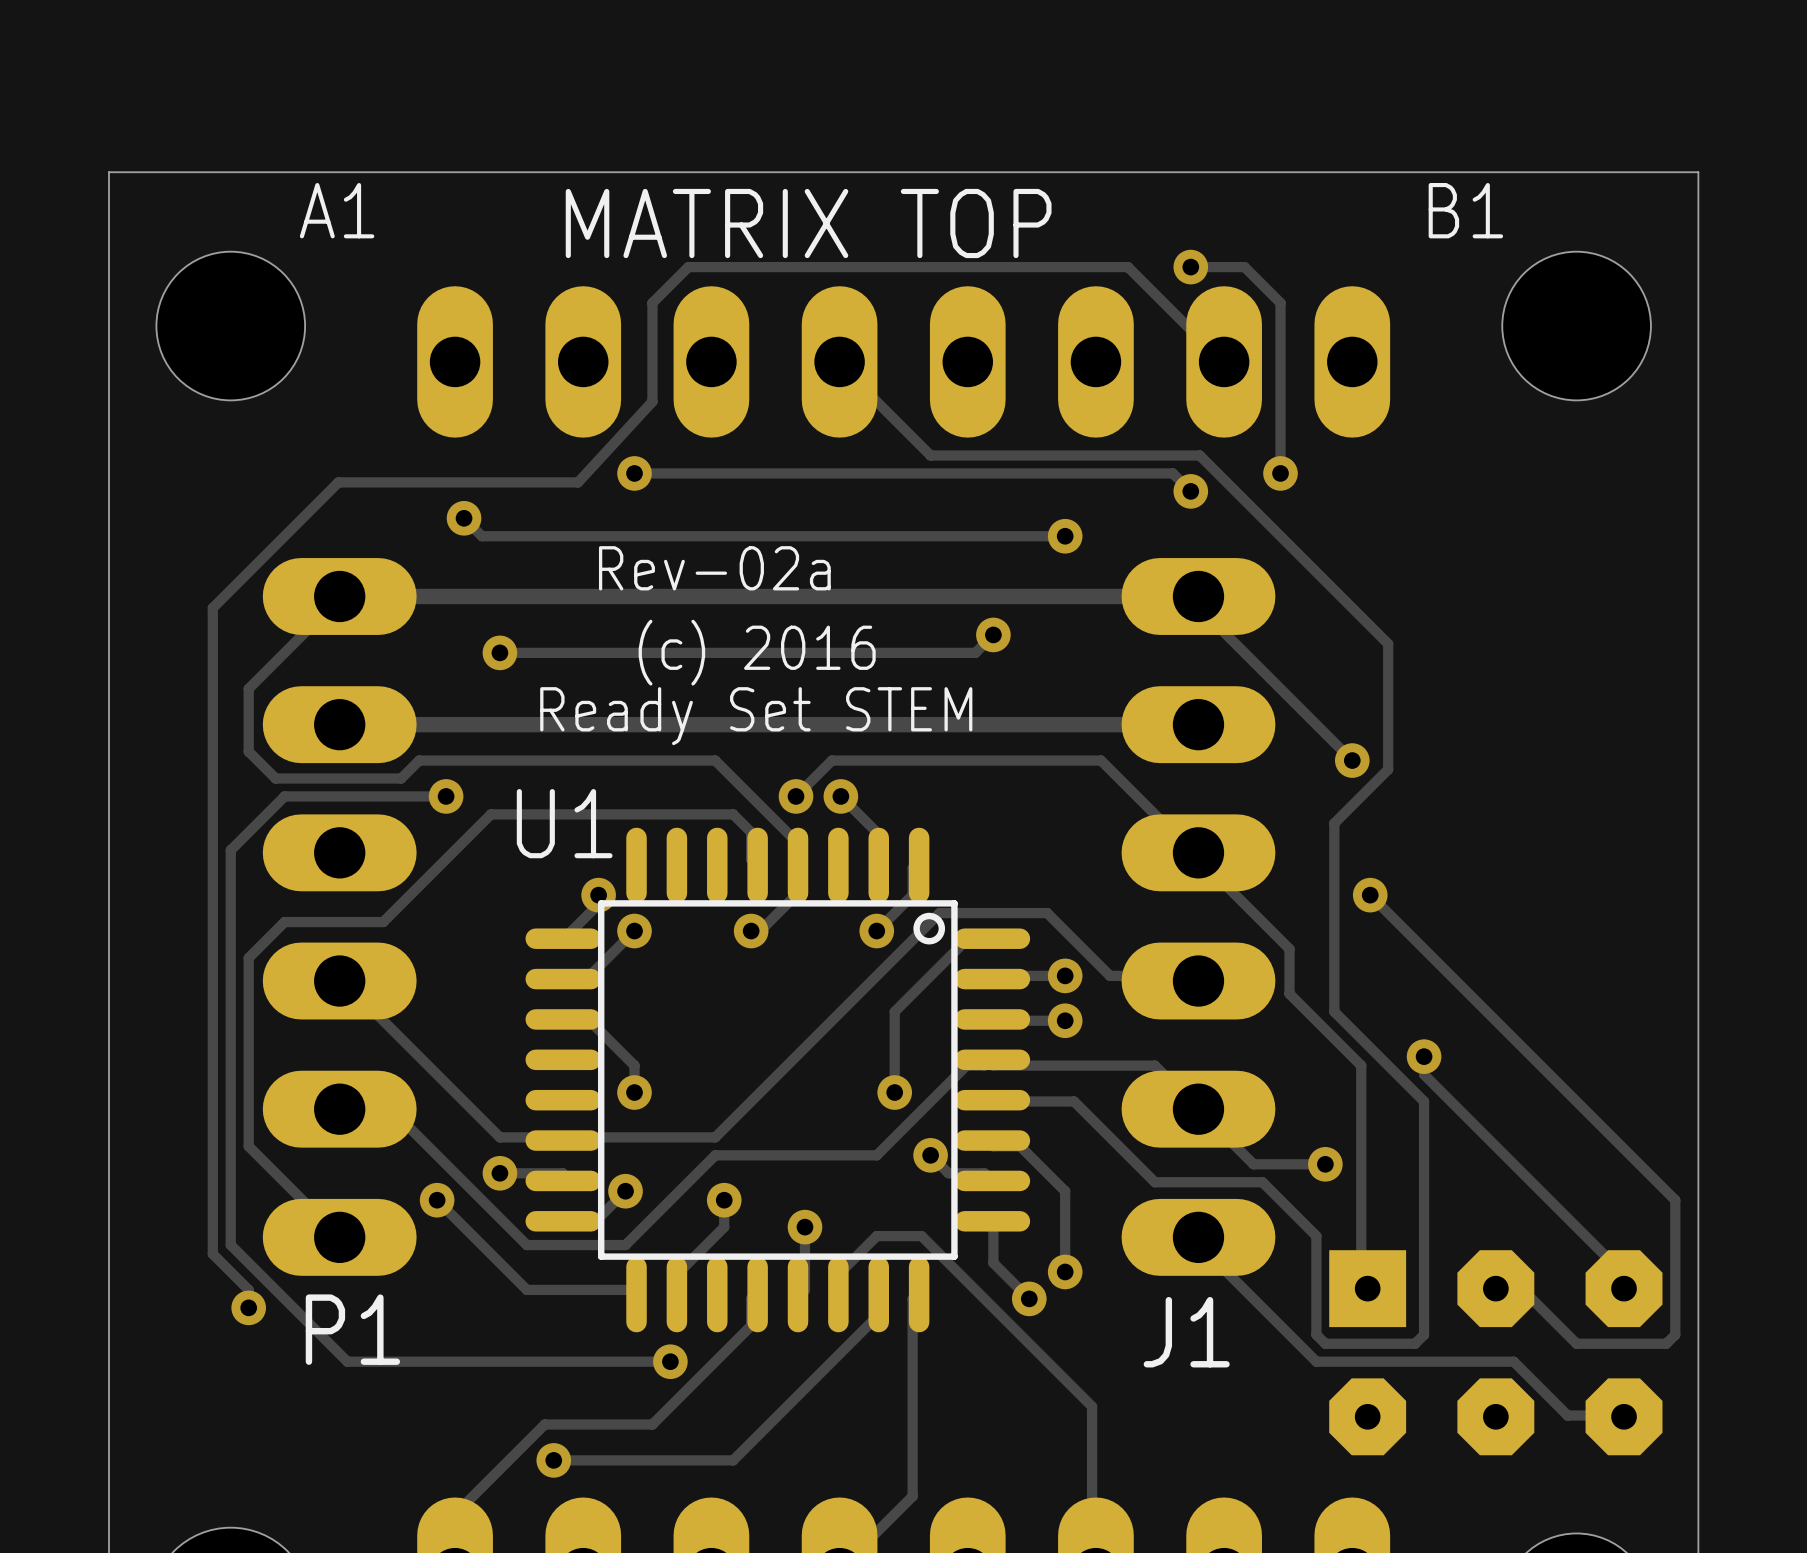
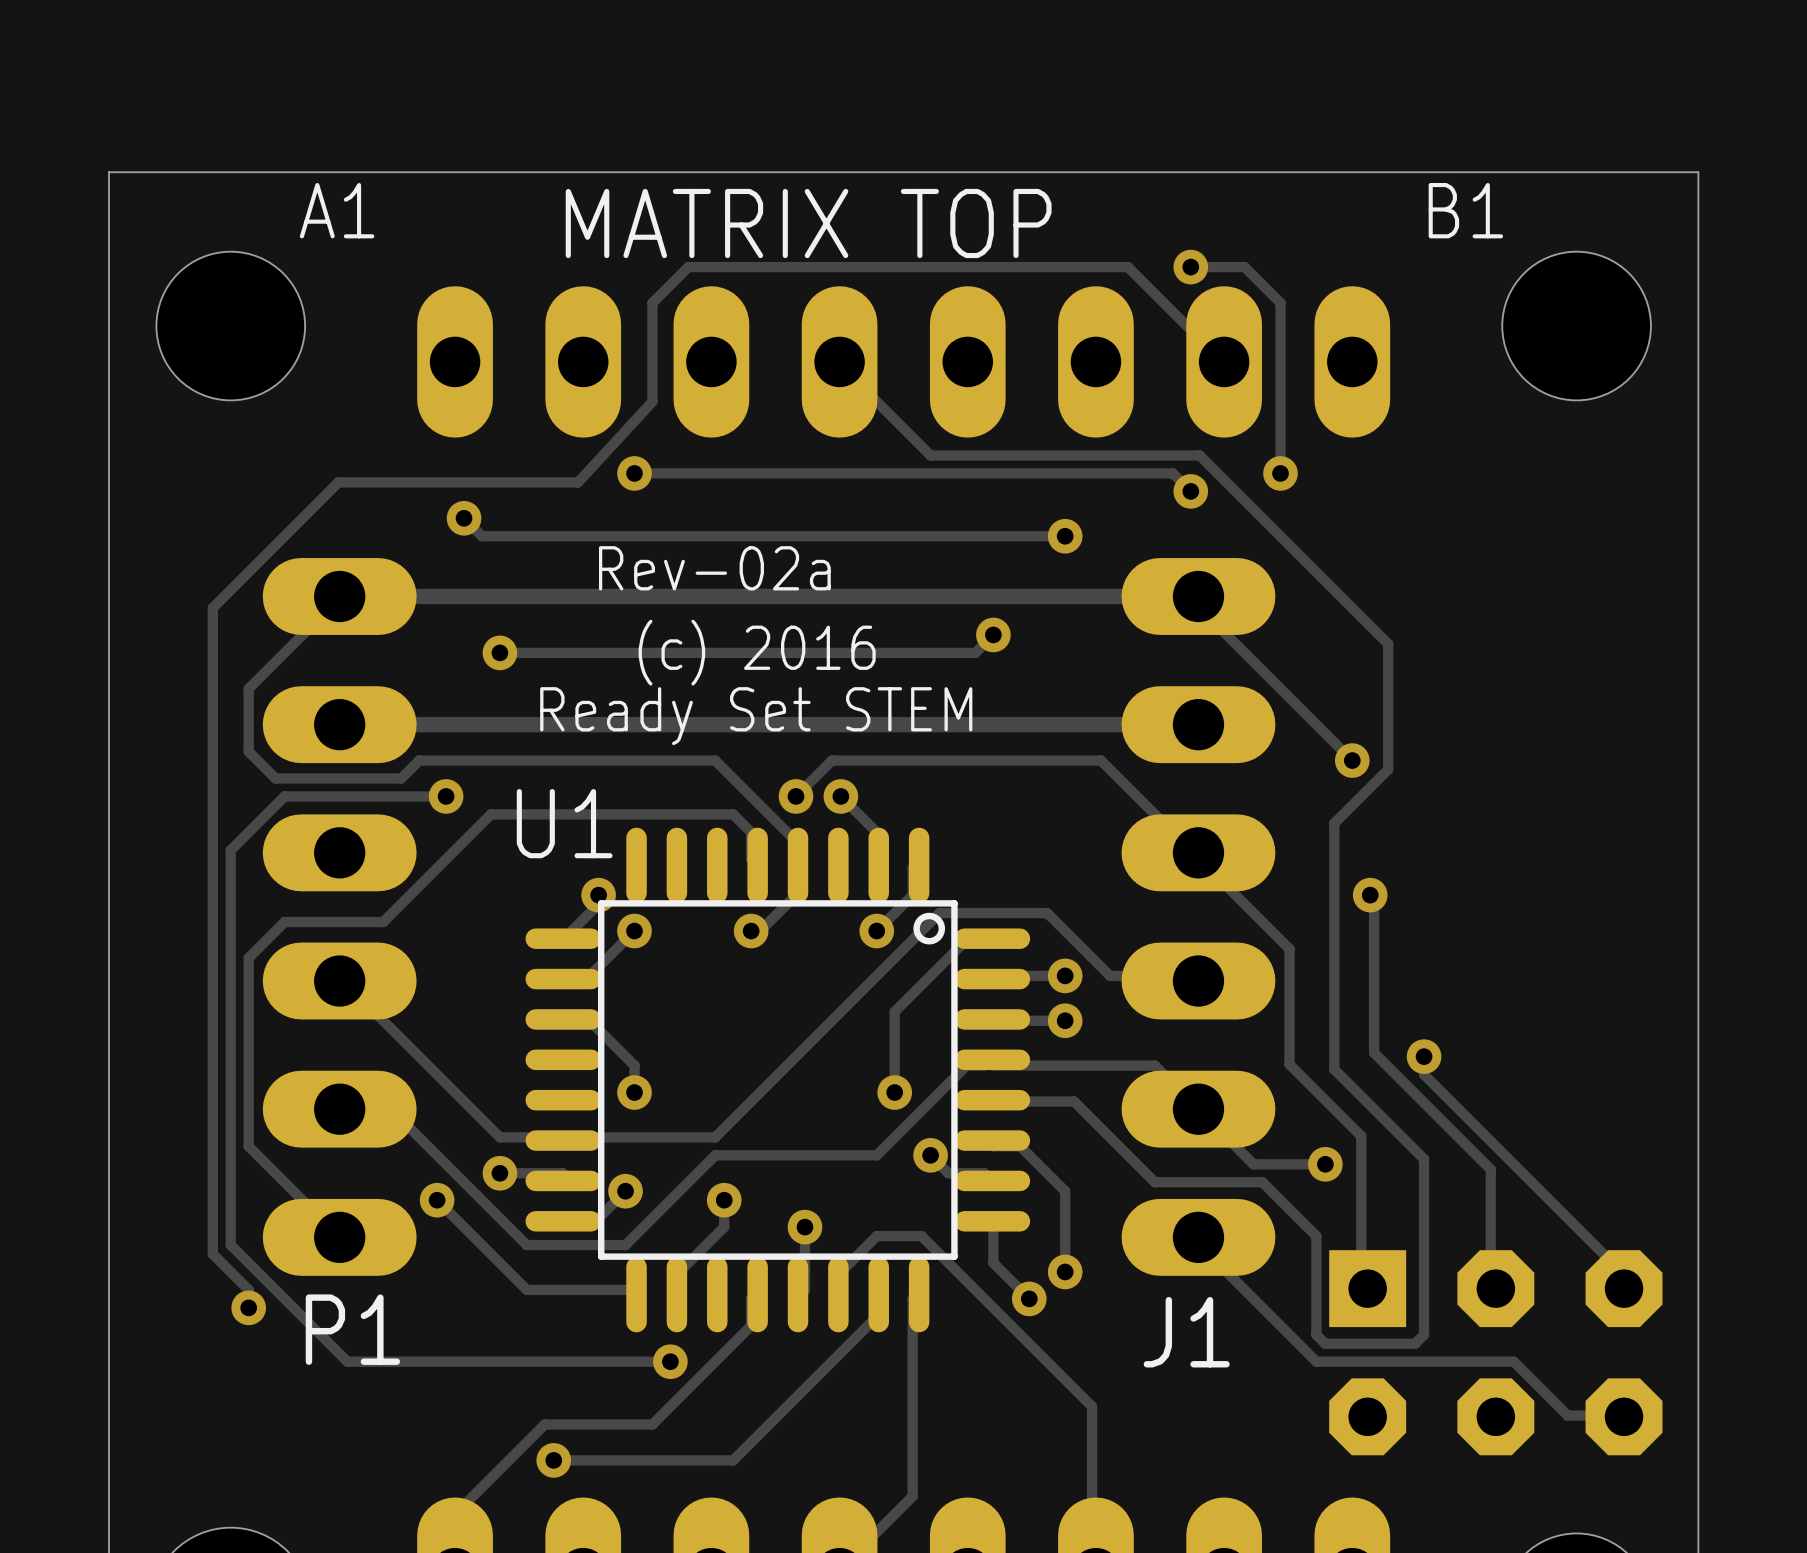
track: (1370, 895) (1675, 1200) (1675, 1334) (1666, 1343) (1576, 1343) (1522, 1289) (1495, 1288) -> (1370, 895) (1374, 900) (1374, 1052) (1490, 1169) (1490, 1286) (1495, 1288)
track: (1289, 993) (1361, 1065) (1361, 1136) -> (1289, 993) (1289, 1064) (1361, 1136)
track: (1334, 1011) (1424, 1101) (1424, 1159) -> (1334, 1011) (1334, 1069) (1424, 1159)
part footprint: [1329, 1250, 1663, 1456] -> [1329, 1250, 1663, 1456]

